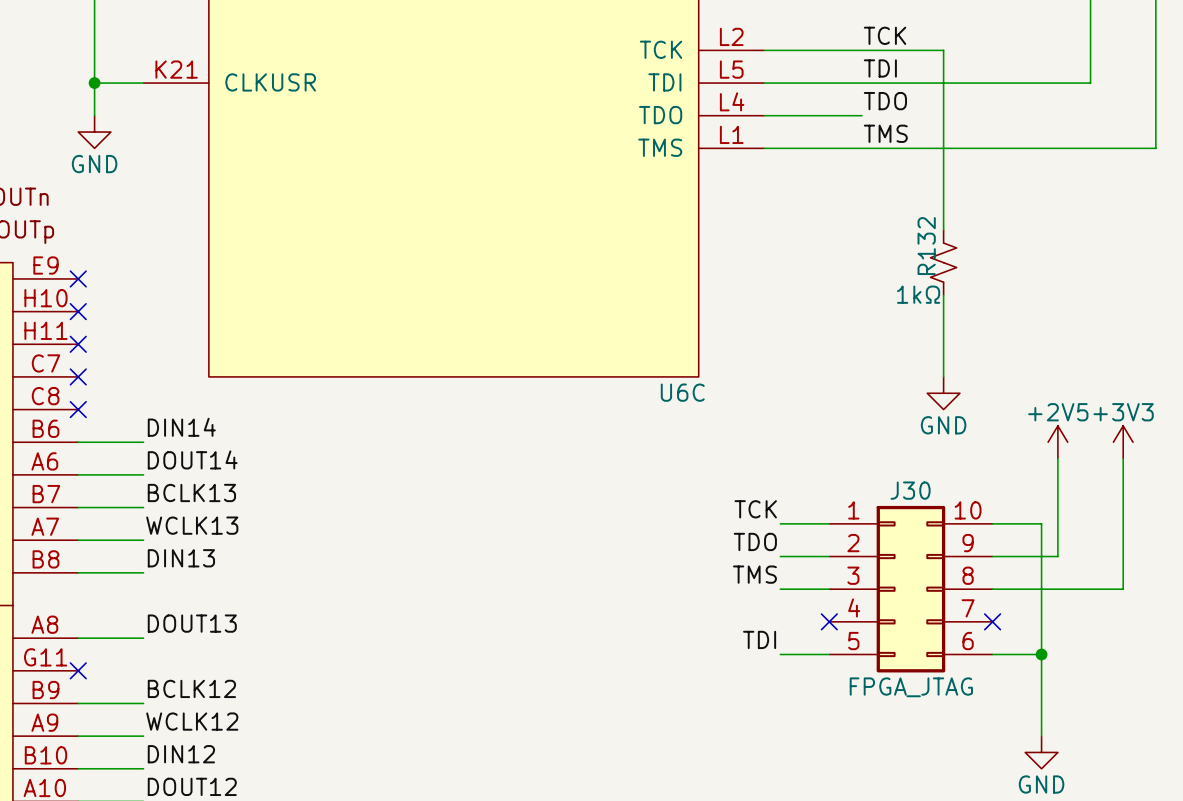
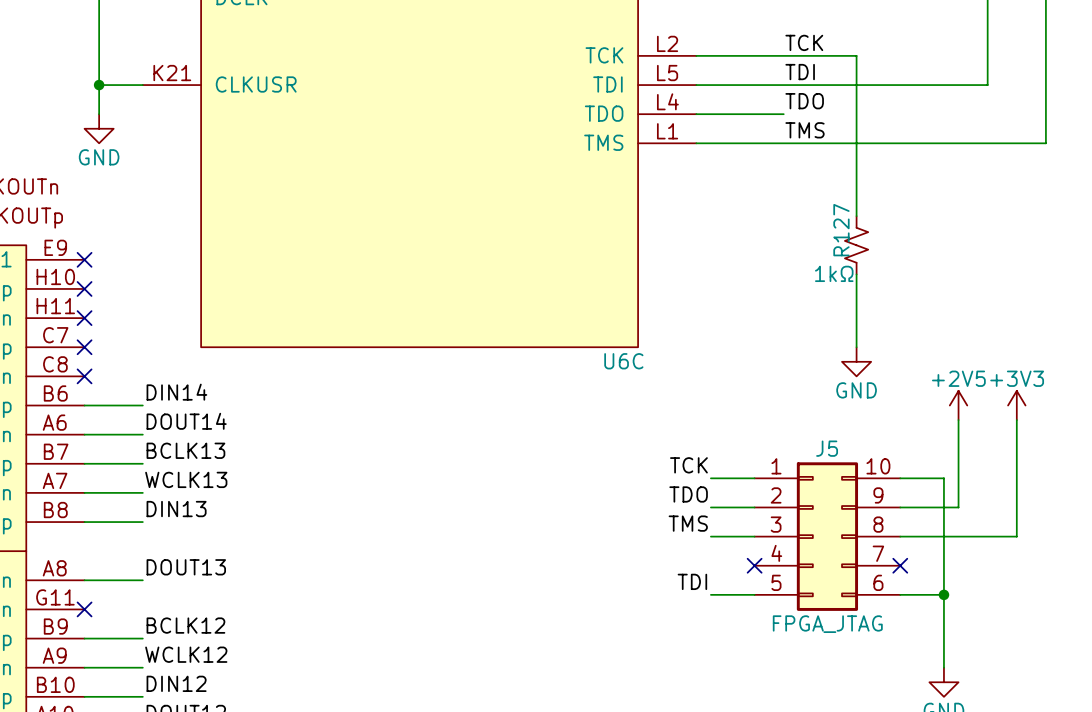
R132 name: R132 (926, 246) -> R127 (841, 230)
J30 name: J30 (910, 490) -> J5 (827, 448)

